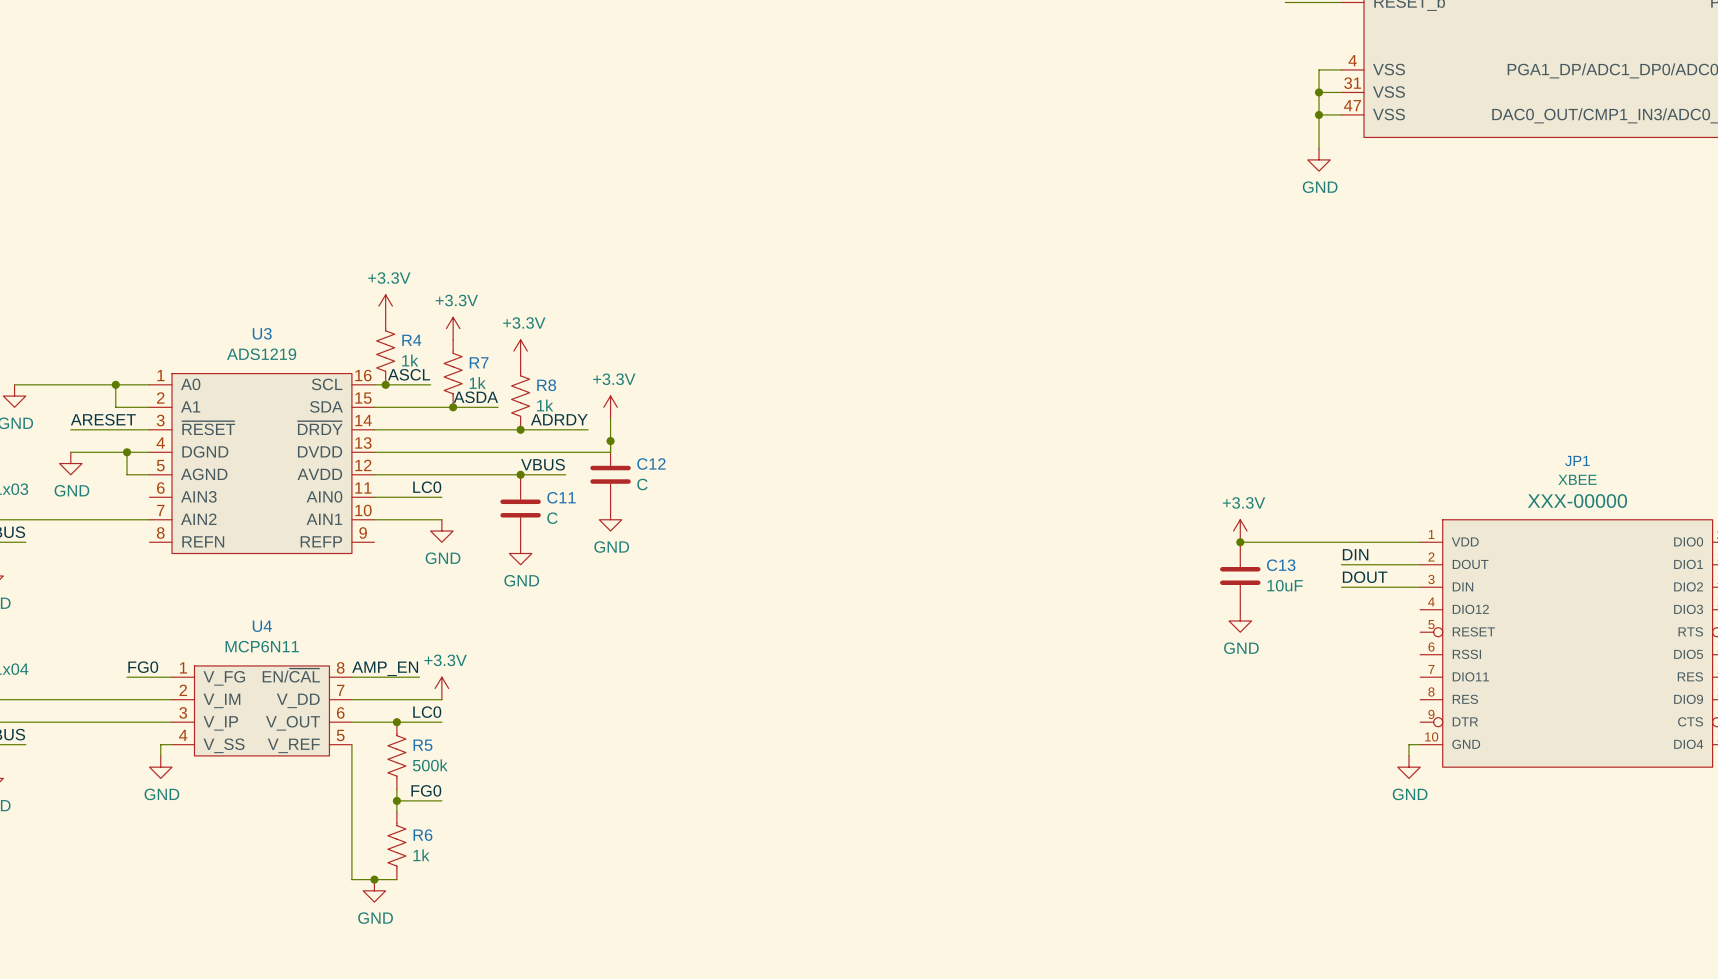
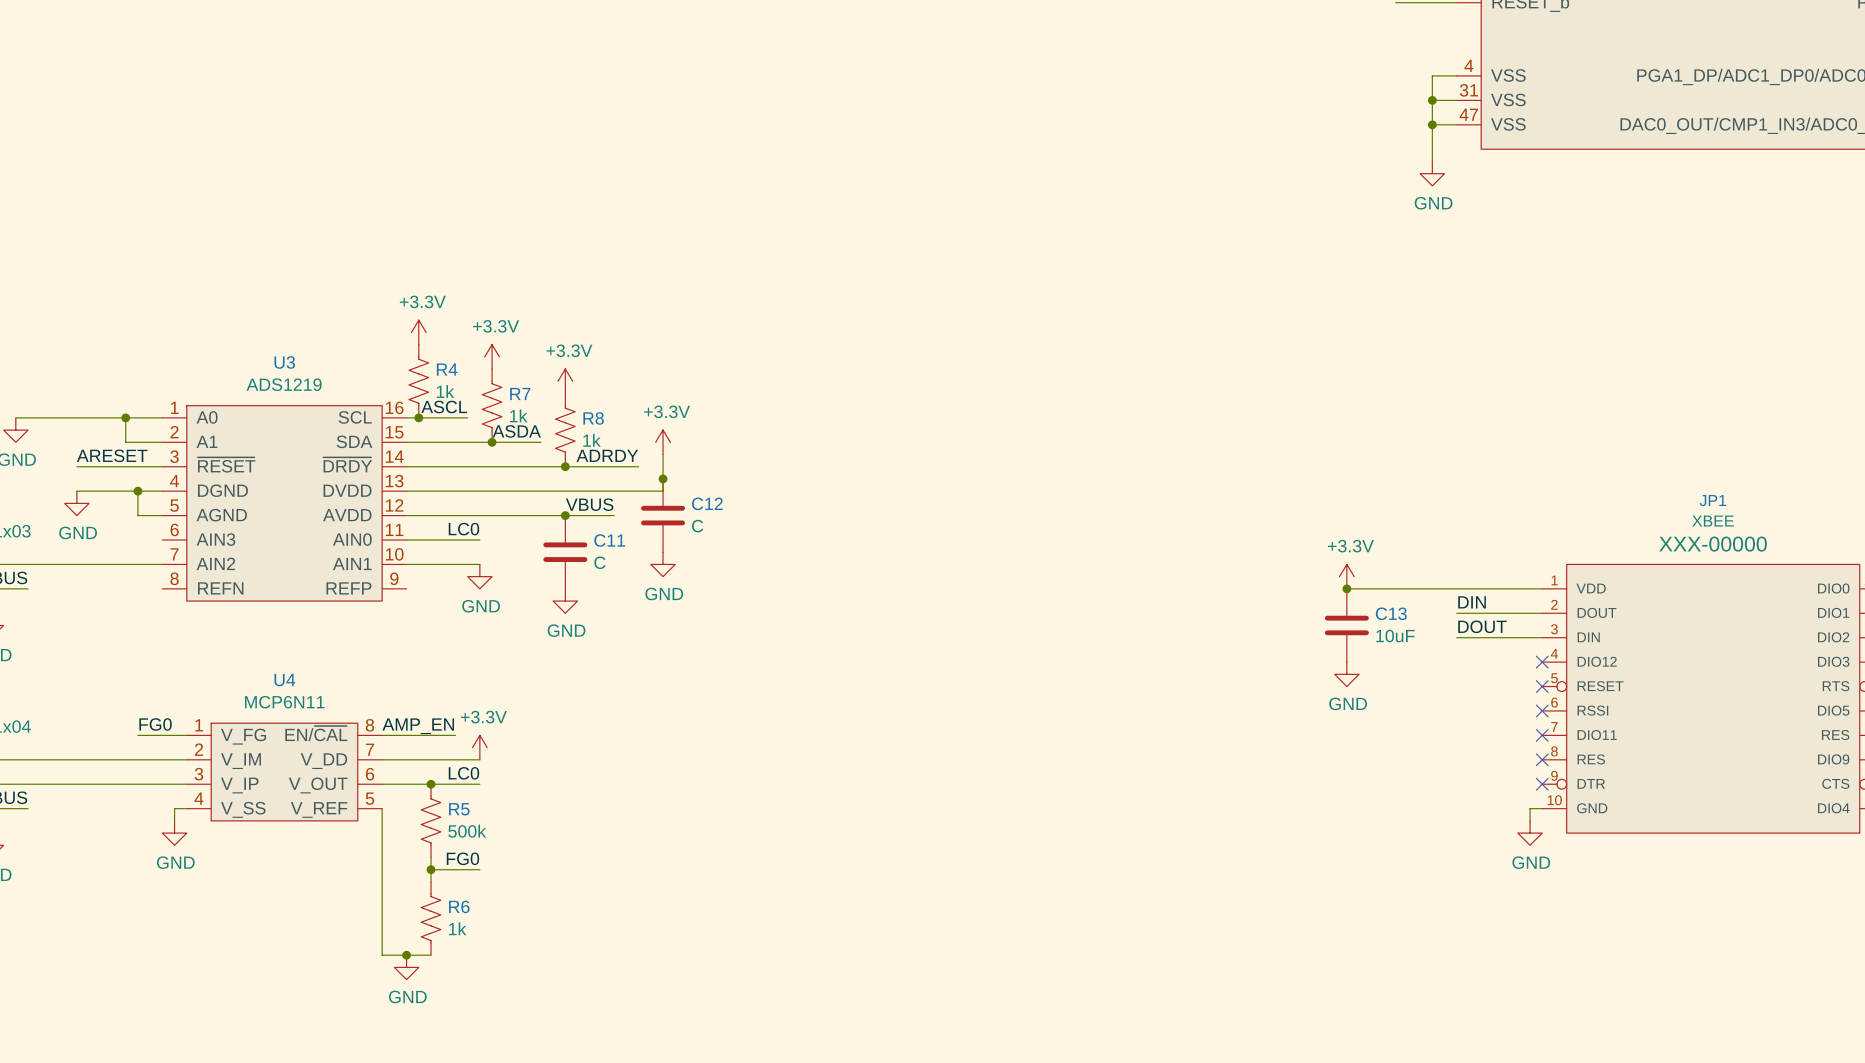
no-connect mark: none -> (1542, 662)
no-connect mark: none -> (1542, 686)
no-connect mark: none -> (1542, 710)
no-connect mark: none -> (1542, 735)
no-connect mark: none -> (1542, 759)
no-connect mark: none -> (1542, 784)

